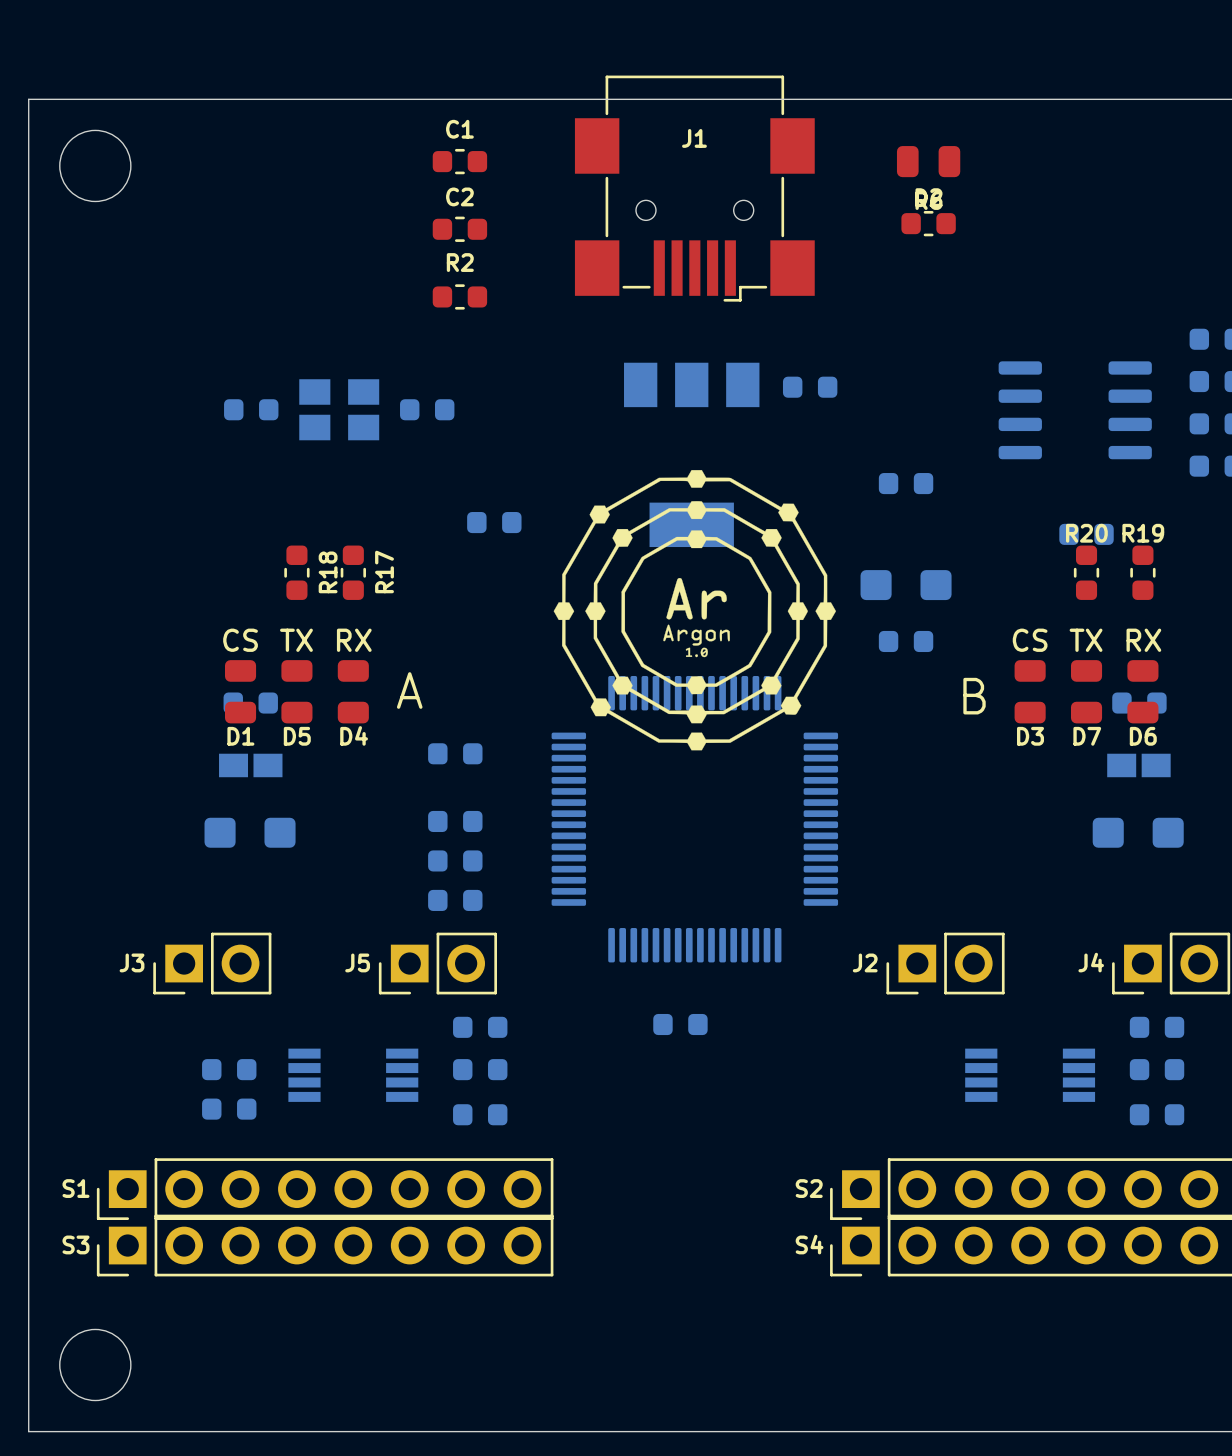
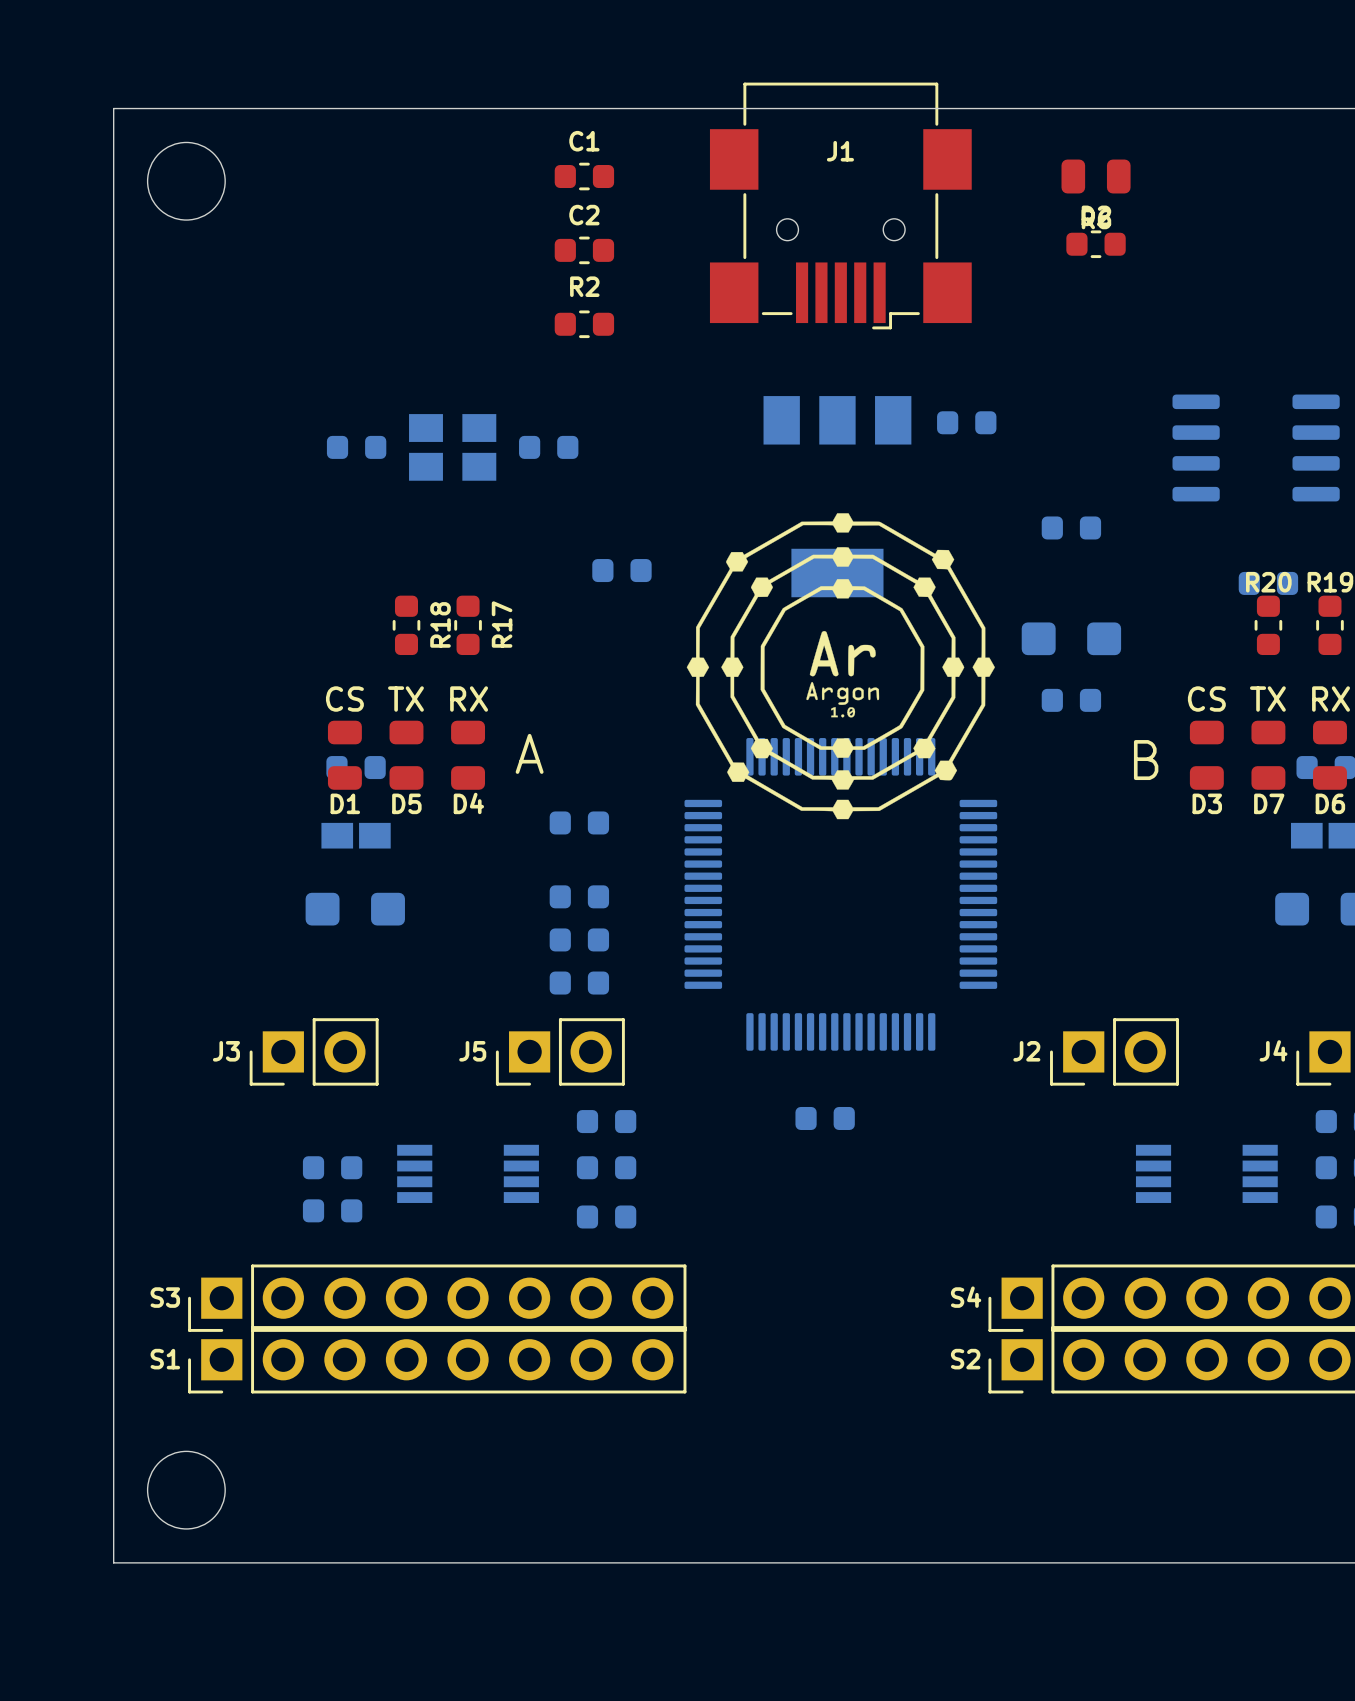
S1 name: S1 (76, 1188) -> S3 (165, 1297)
S2 name: S2 (809, 1188) -> S4 (966, 1297)
S3 name: S3 (76, 1244) -> S1 (165, 1359)
S4 name: S4 (809, 1244) -> S2 (965, 1359)

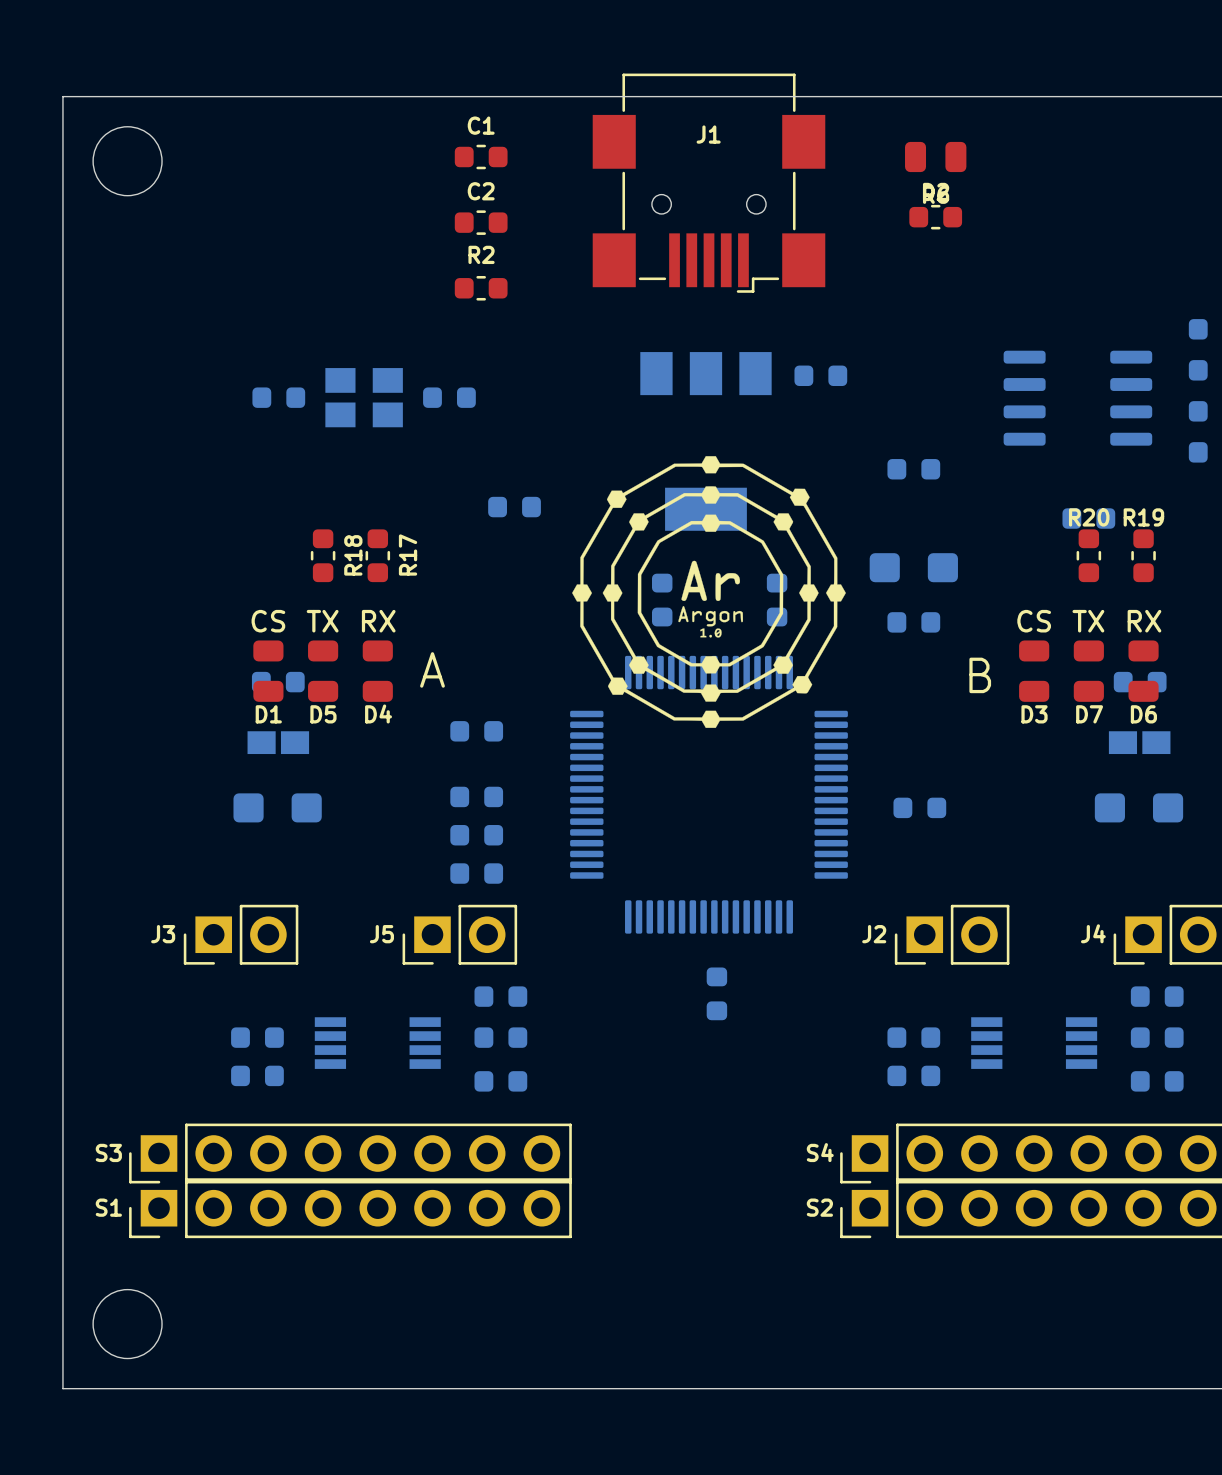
part: none -> (662, 600)
part: none -> (777, 600)
part: none -> (919, 807)
part rotation: 0° (825, 1118) -> 90° clockwise (716, 993)
part: none -> (913, 1037)
part: none -> (913, 1075)

